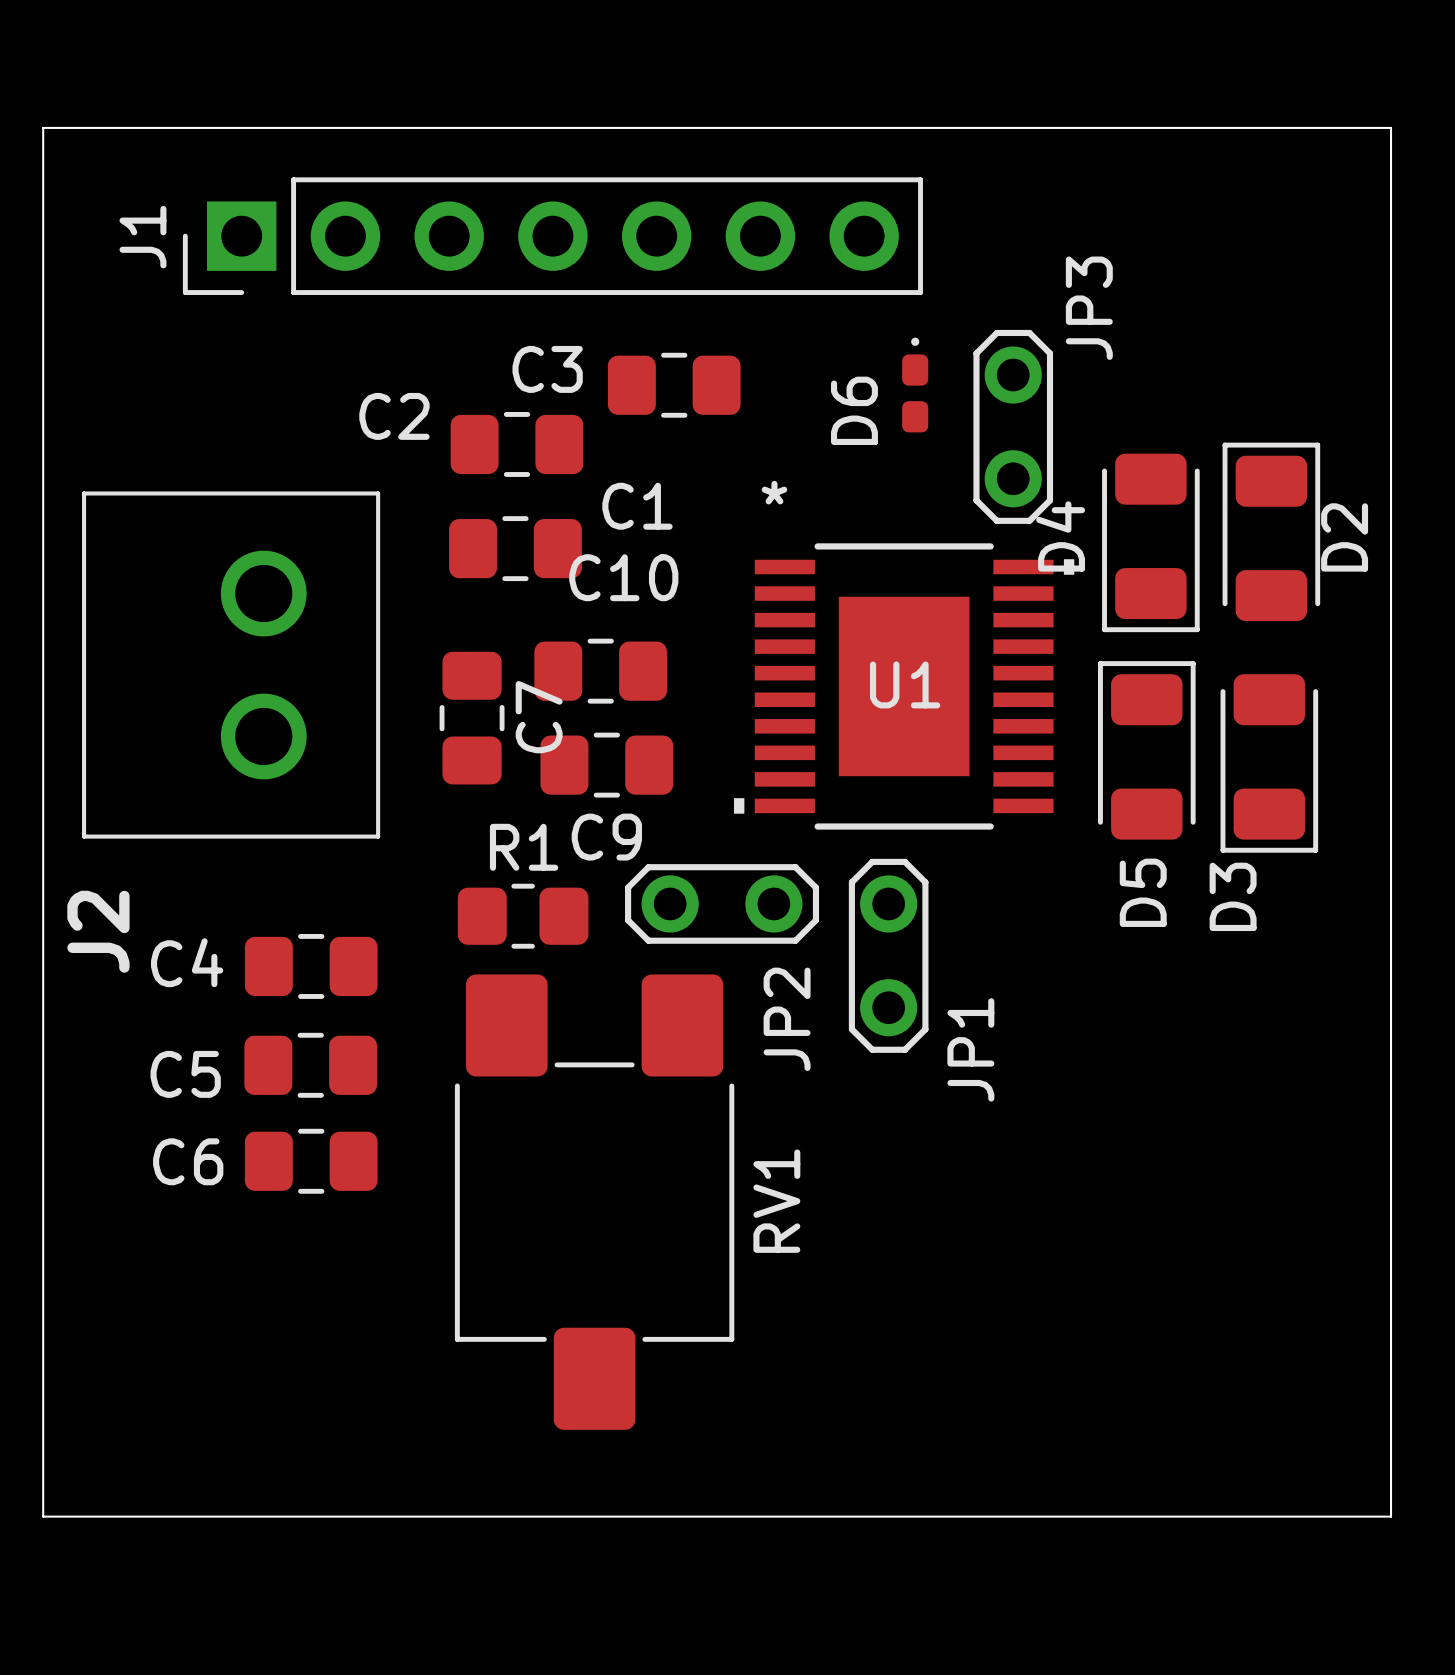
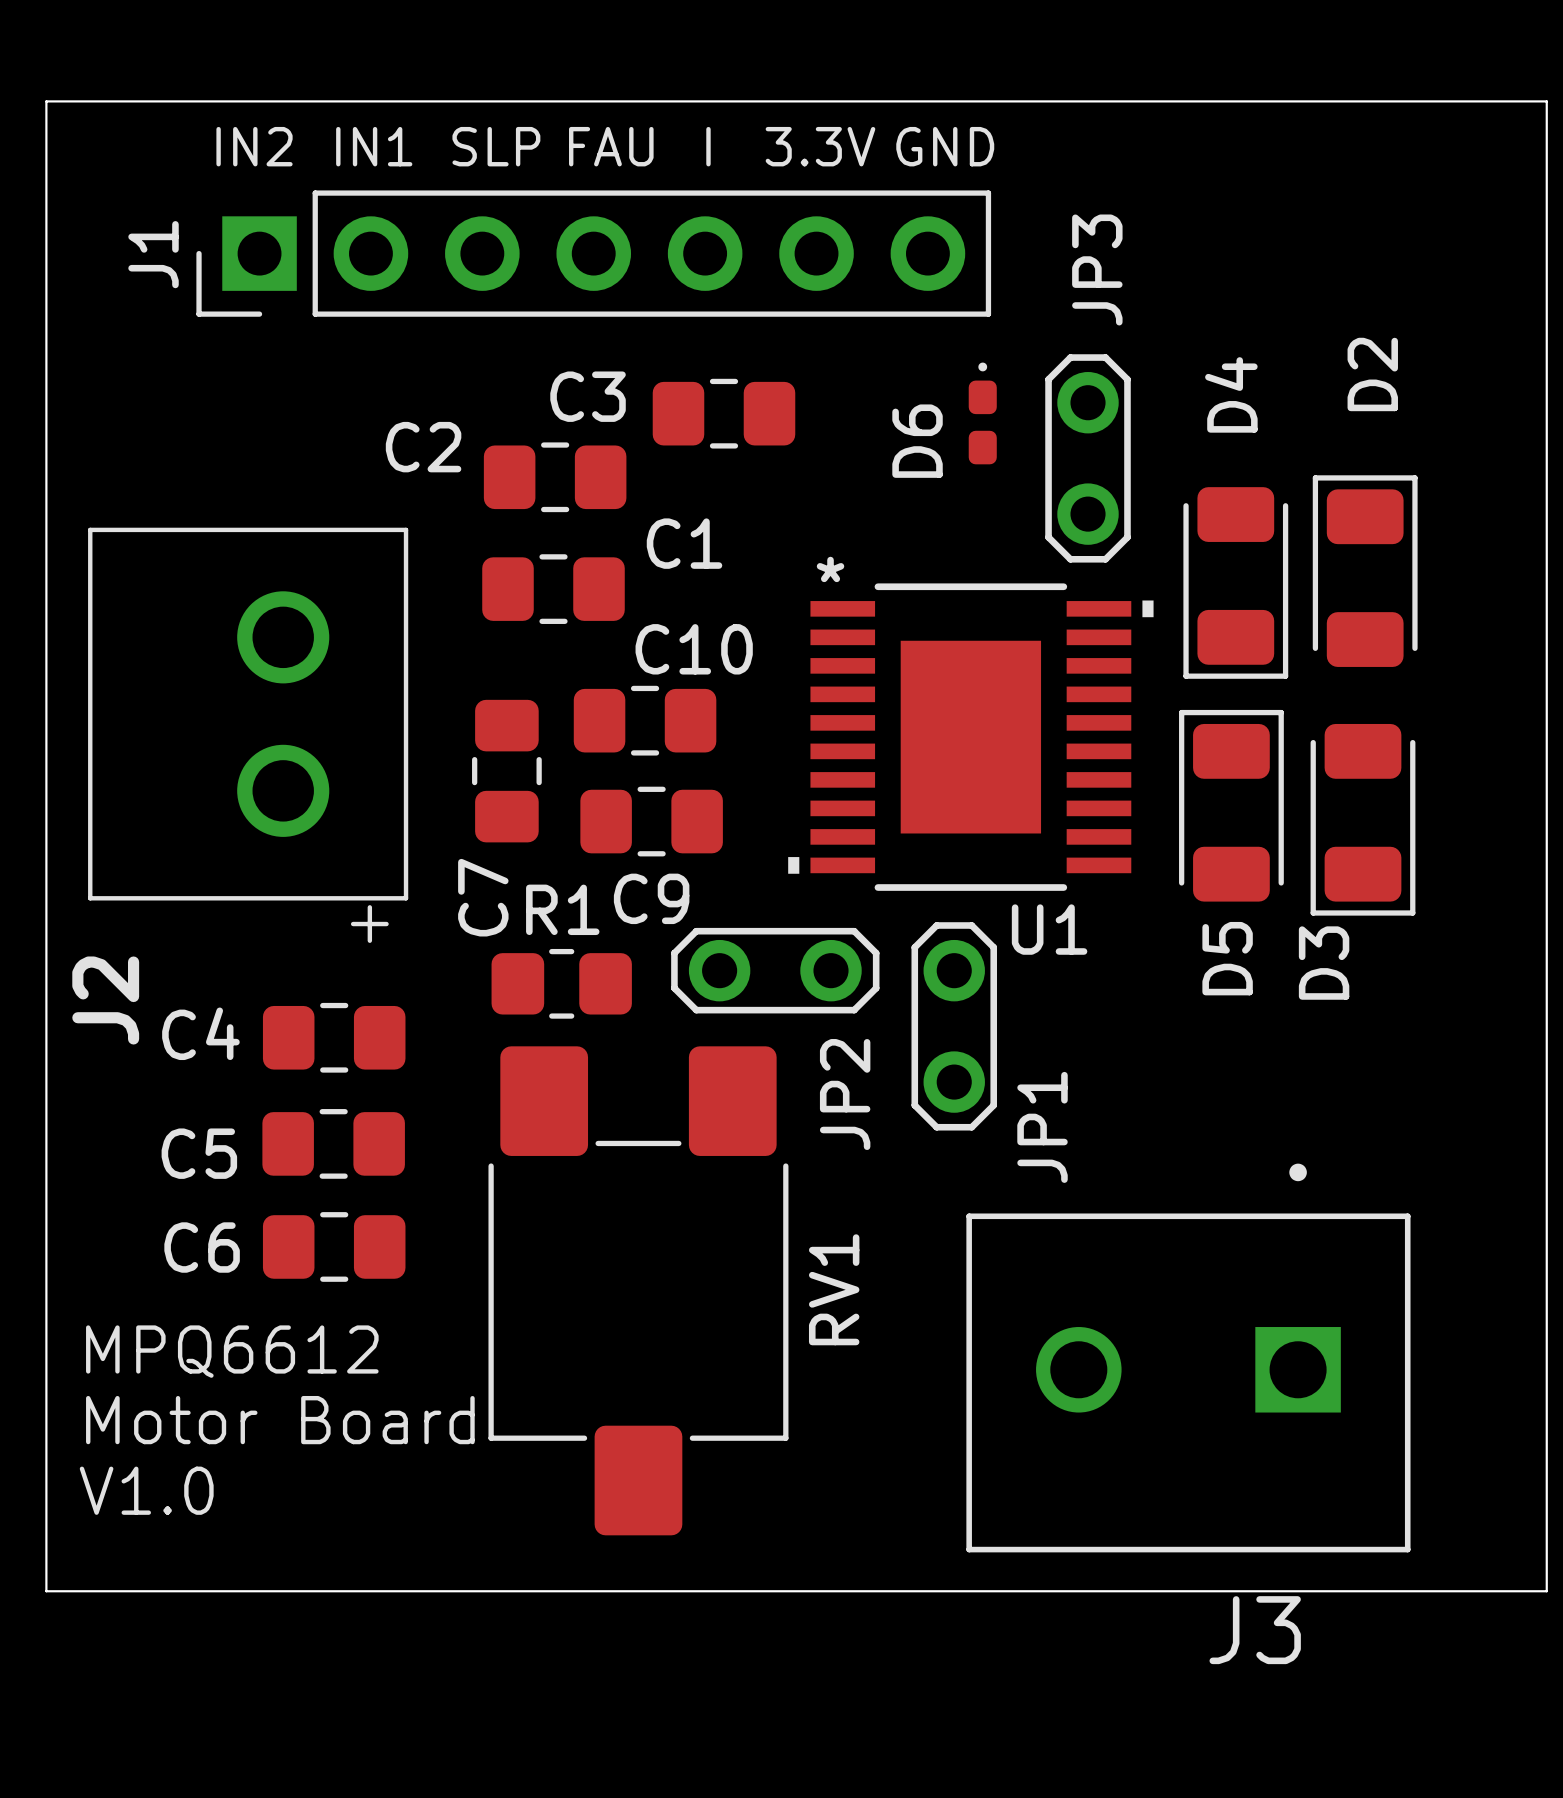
board edge: (43, 127) (1391, 127) (1391, 1516) (43, 1516) (43, 1481) -> (46, 137) (46, 101) (1546, 101) (1546, 1591) (46, 1591)
text: none -> IN2 (254, 146)
text: none -> IN1 (374, 146)
text: none -> SLP (496, 146)
text: none -> FAU (611, 146)
text: none -> I (708, 146)
text: none -> 3.3V (820, 146)
text: none -> GND (945, 146)
JP3 name position: JP3 (1089, 308) -> JP3 (1097, 269)
U1 text position: * (774, 492) -> * (830, 569)
D4 name position: D4 (1060, 536) -> D4 (1231, 394)
D2 name position: D2 (1344, 537) -> D2 (1372, 374)
C10 name position: C10 (623, 577) -> C10 (694, 649)
U1 name position: U1 (905, 684) -> U1 (1049, 929)
C7 name position: C7 (539, 717) -> C7 (483, 897)
text: none -> + (369, 924)
text: none -> MPQ6612 (232, 1351)
J3: none -> (1188, 1358)
text: none -> Motor Board (280, 1420)
text: none -> V1.0 (146, 1490)

